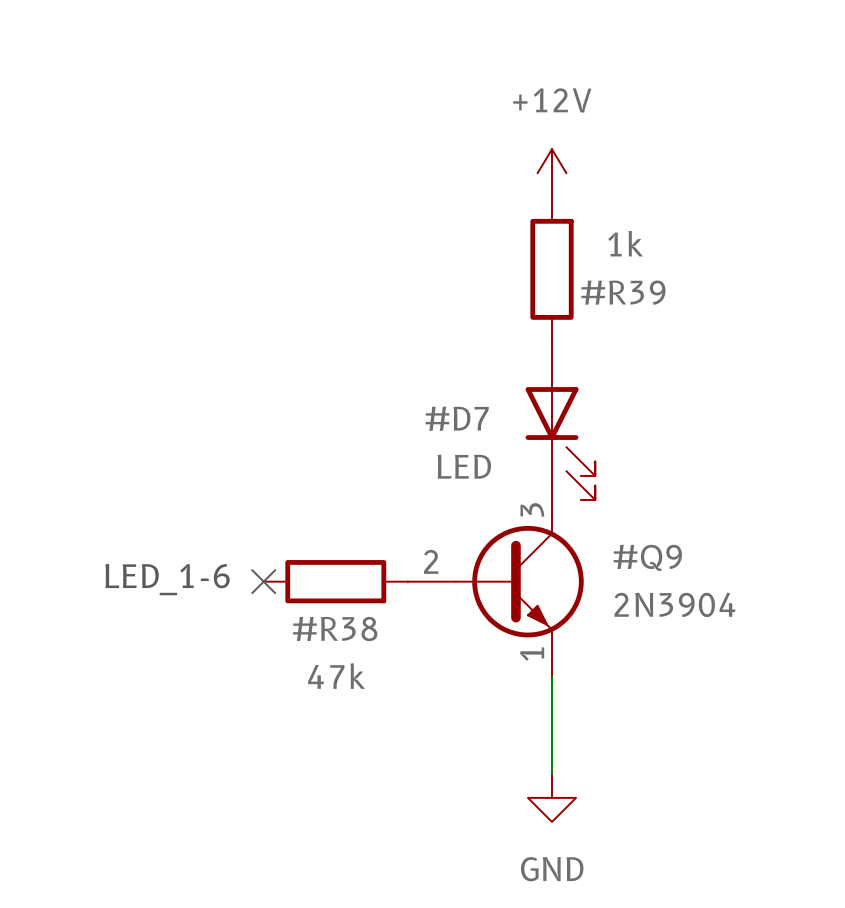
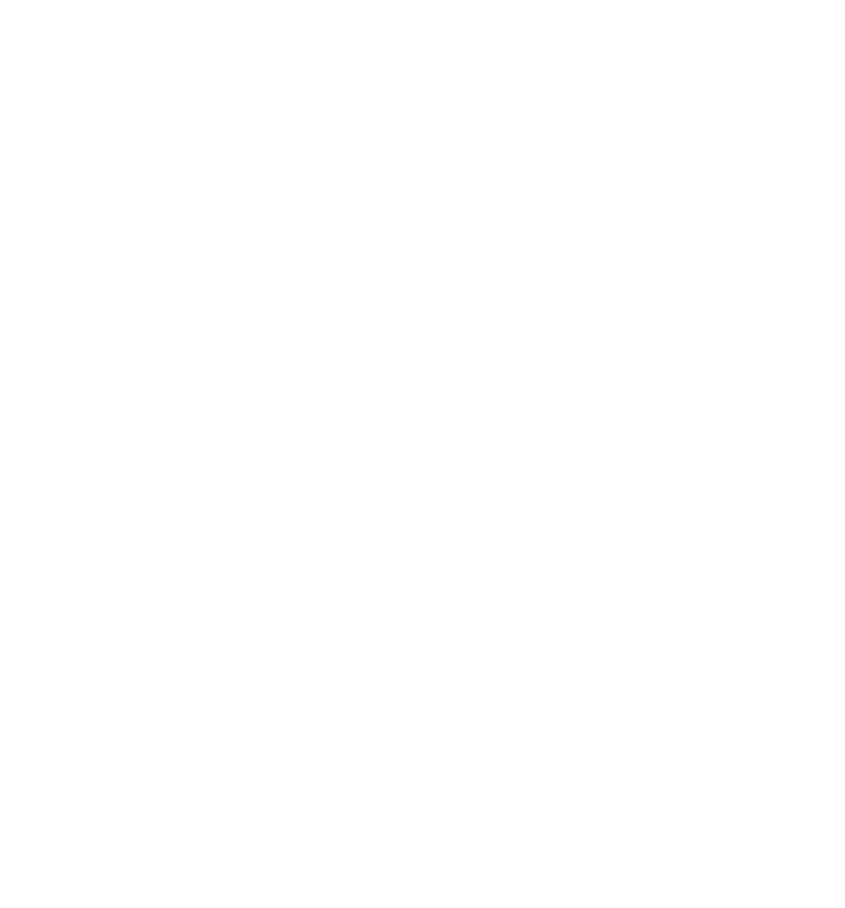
power symbol: +12V (552, 173) -> none
#R39: 1k (552, 269) -> none
#D7: LED (560, 420) -> none
text: LED_1-6 (167, 579) -> none
no-connect mark: (263, 581) -> none
#R38: 47k (335, 581) -> none
#Q9: 2N3904 (495, 581) -> none
wire: (552, 677) (552, 773) -> none
power symbol: GND (552, 797) -> none

